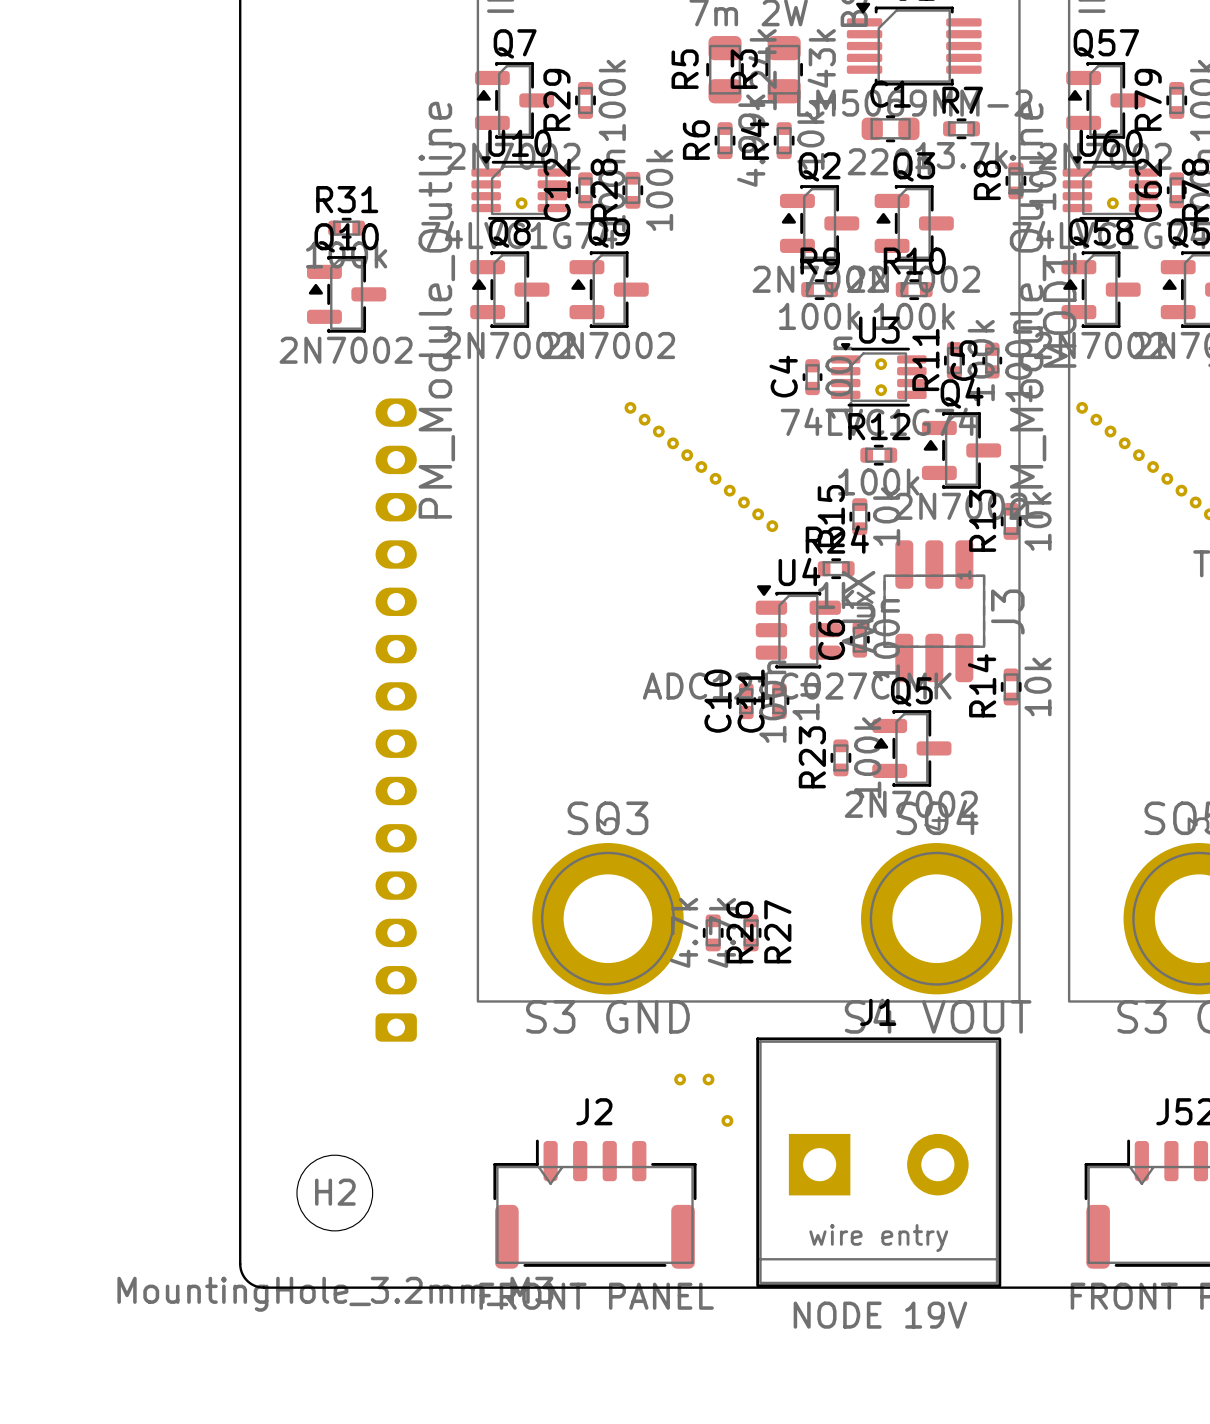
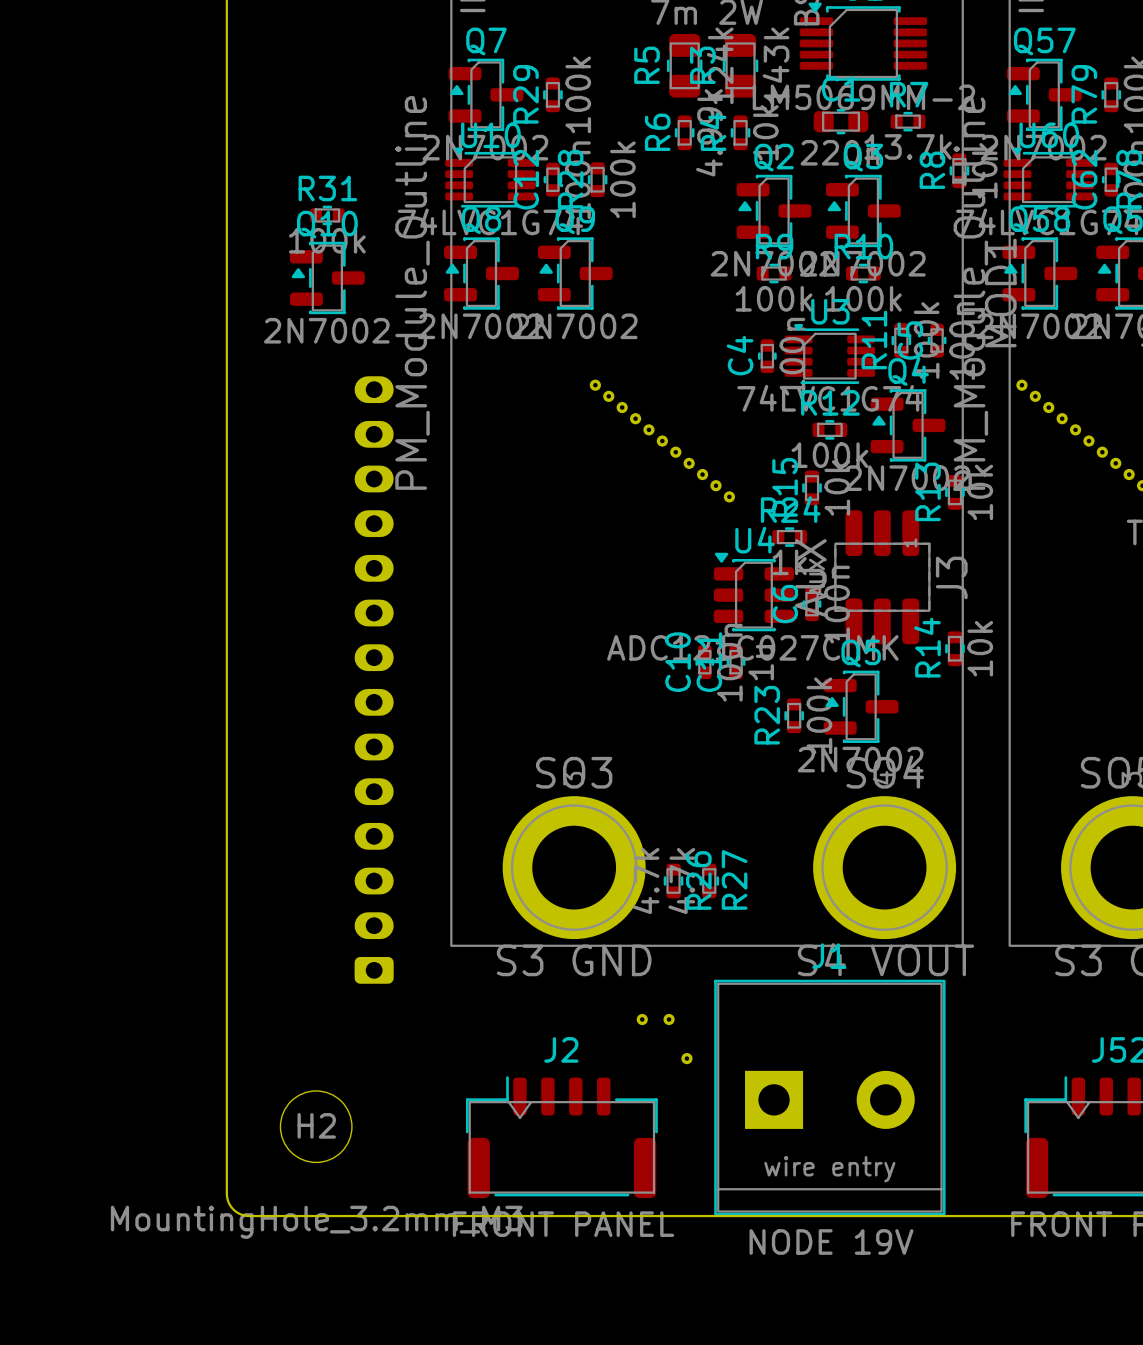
part: (521, 203) -> none
part: (1112, 203) -> none
part: (881, 364) -> none
part: (881, 390) -> none

